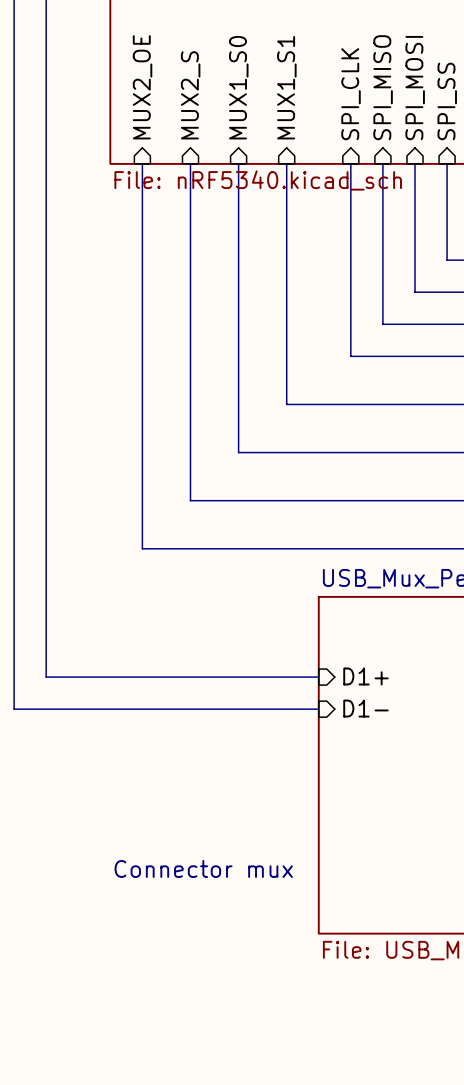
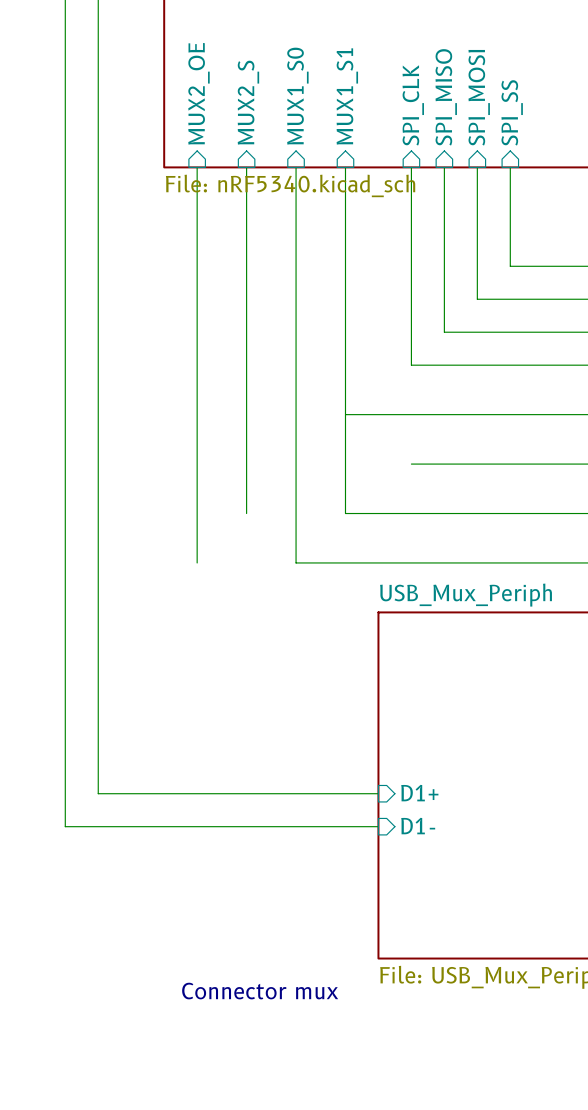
wire: (238, 452) (350, 452) -> none
wire: (190, 500) (286, 500) -> (345, 414) (345, 513)
wire: (142, 548) (238, 548) -> (296, 464) (296, 562)
sheet pin position: D1+ (365, 676) -> D1+ (419, 793)
wire: (46, 677) (318, 677) -> (98, 694) (98, 793) (378, 793)
sheet pin position: D1- (365, 708) -> D1- (418, 826)
wire: (14, 709) (318, 709) -> (65, 727) (65, 826) (378, 826)
text position: Connector mux (203, 868) -> Connector mux (260, 991)

